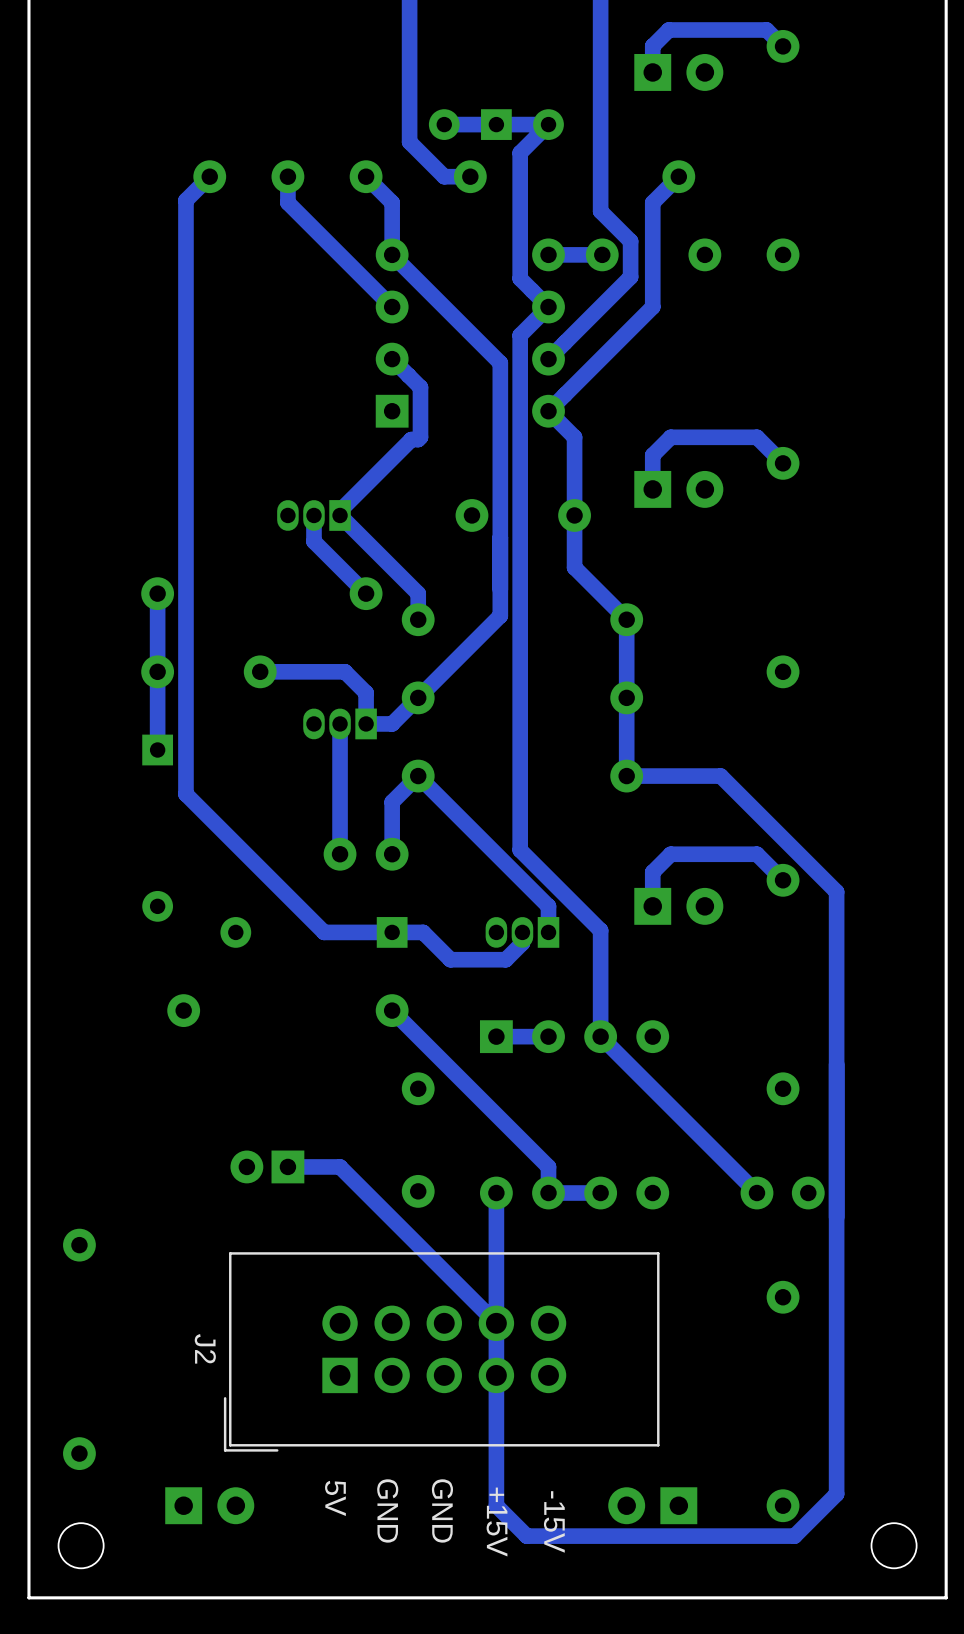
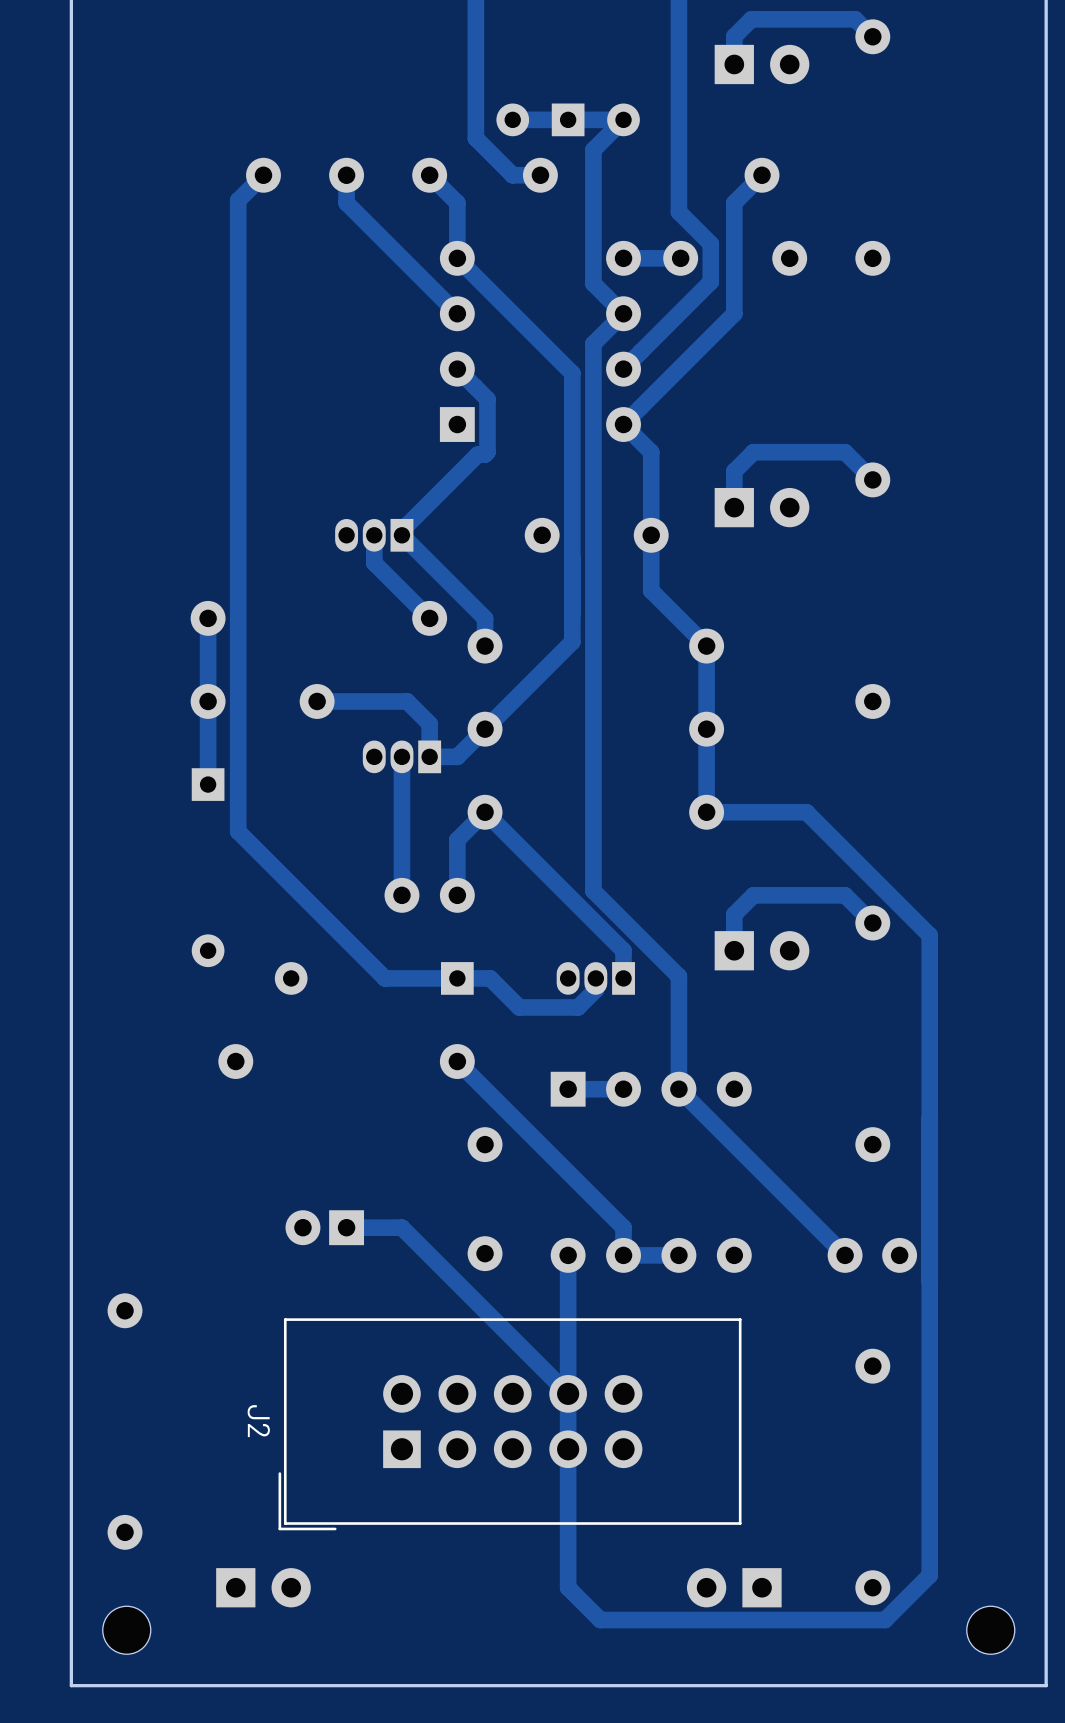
text: 5V (335, 1498) -> none
text: GND (387, 1510) -> none
text: GND (442, 1510) -> none
text: -15V (554, 1521) -> none
text: +15V (497, 1522) -> none

